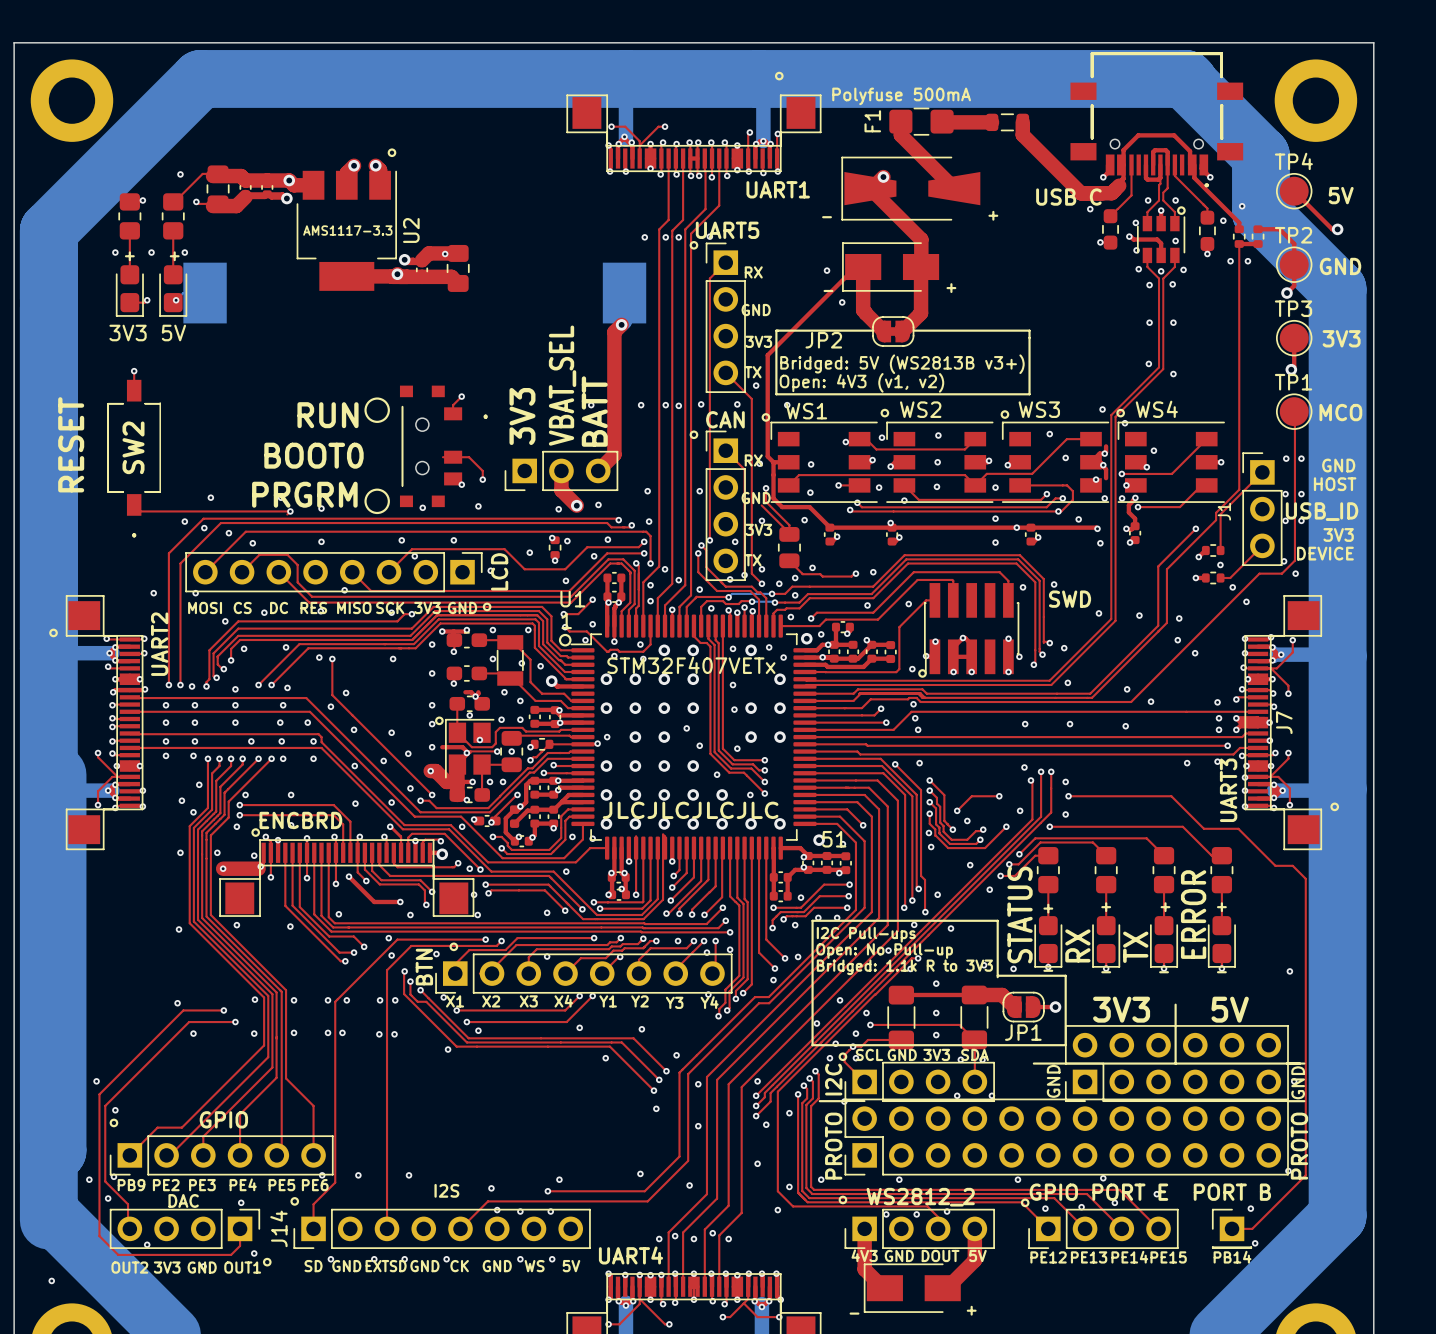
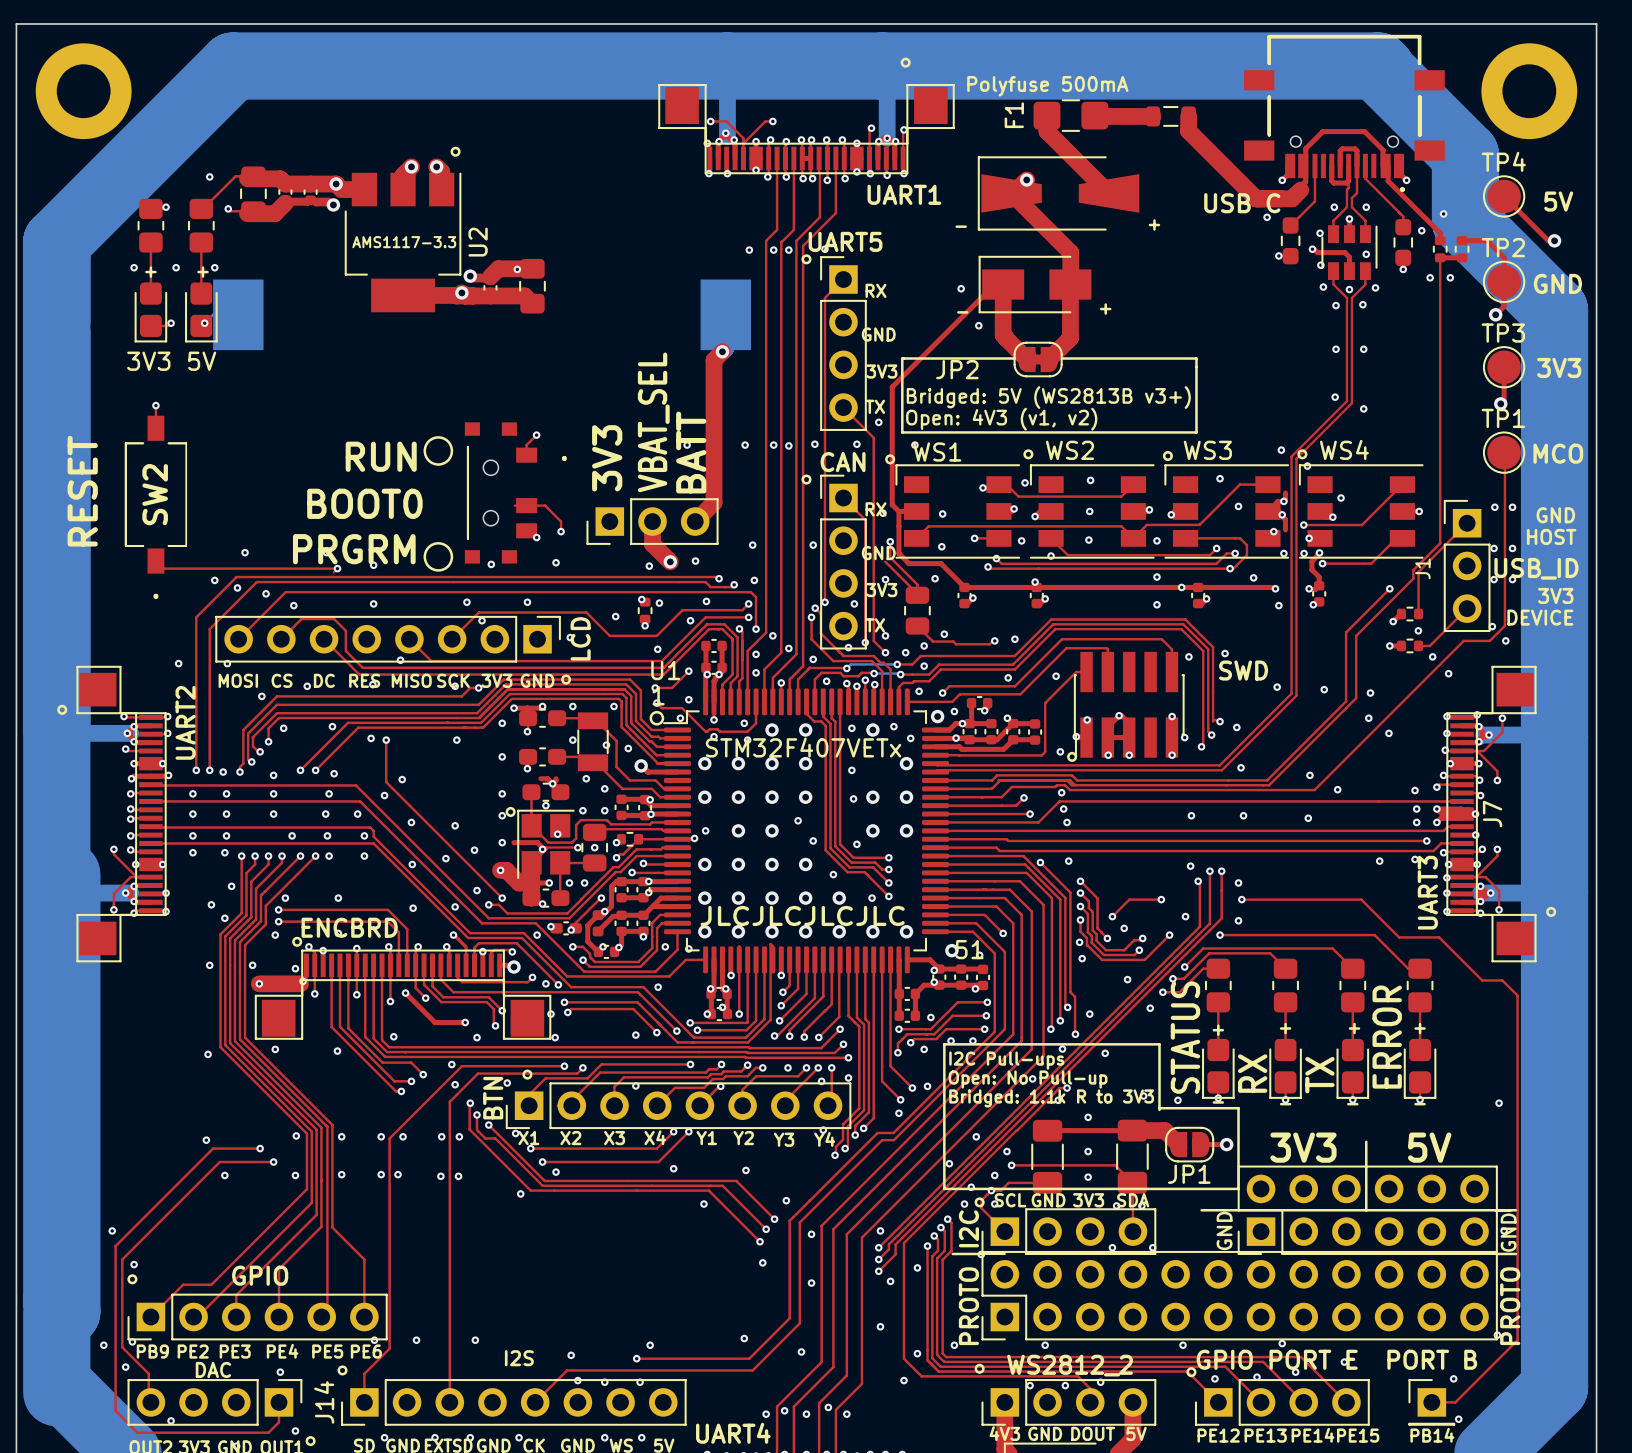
drawing: [1177, 206, 1186, 215] -> none

